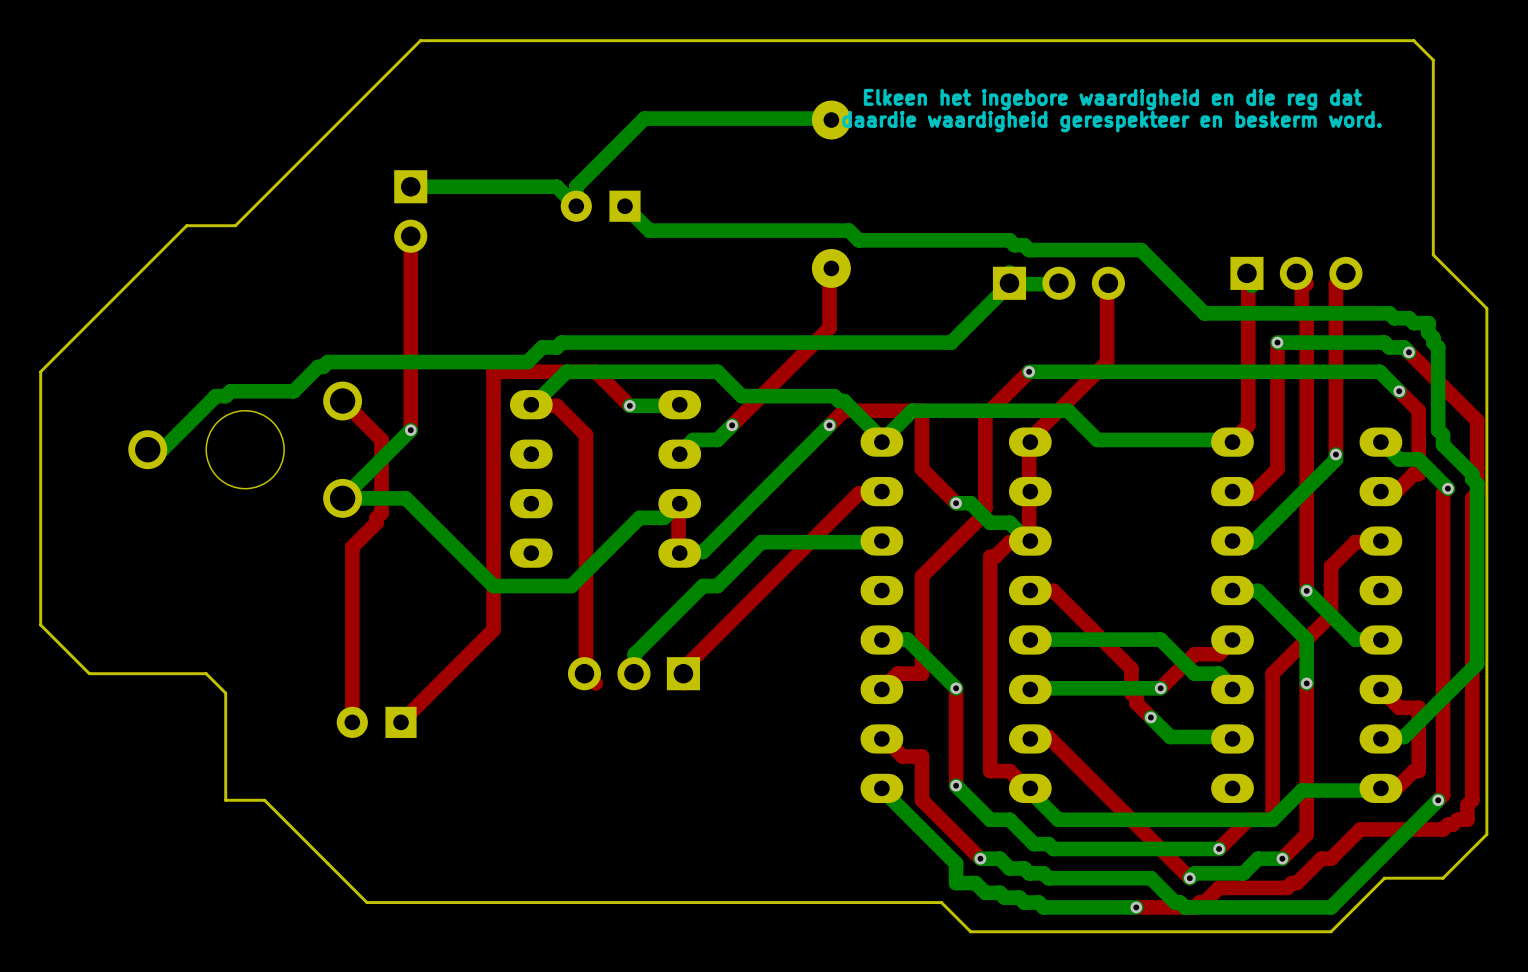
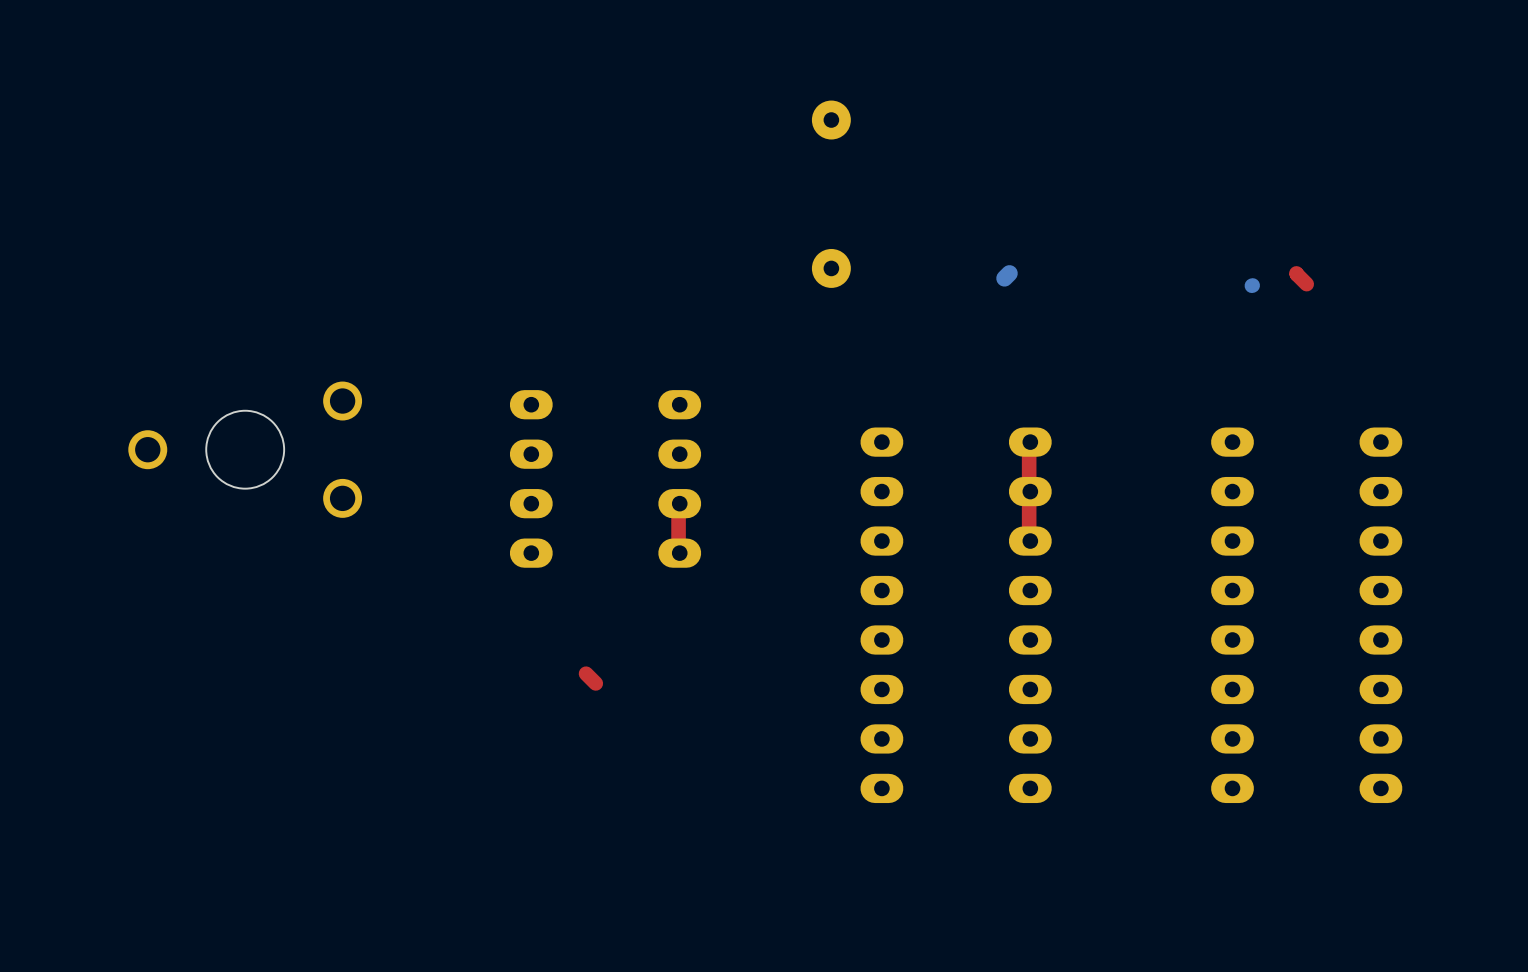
board edge: (1413, 40) (1433, 60) (1433, 254) (1486, 308) (1486, 834) (1443, 878) (1384, 878) (1331, 931) (970, 931) (941, 902) (366, 902) (264, 800) (225, 800) (225, 693) (206, 673) (89, 673) (40, 625) (40, 371) (186, 225) (235, 225) (420, 40) (1413, 40) -> none
text: Elkeen het ingebore waardigheid en die reg dat (1112, 99) -> none
bottom track: (831, 120) (644, 118) (576, 186) (576, 206) (556, 186) (410, 186) -> none
text: daardie waardigheid gerespekteer en beskerm word. (1111, 121) -> none
part: (600, 206) -> none
bottom track: (625, 206) (649, 230) (848, 230) (858, 240) (1009, 240) (1014, 245) (1024, 245) (1029, 250) (1141, 250) (1204, 313) (1389, 313) (1394, 318) (1408, 318) (1413, 323) (1428, 323) (1428, 332) (1438, 347) (1438, 430) (1443, 435) (1443, 444) (1472, 474) (1472, 478) (1477, 483) (1477, 663) (1404, 736) (1379, 736) (1380, 738) -> none
part: (410, 211) -> none
top track: (410, 236) (410, 430) -> none
top track: (831, 268) (829, 269) (829, 327) (732, 425) -> none
top track: (1246, 273) (1248, 425) (1232, 442) -> none
part: (1296, 273) -> none
top track: (1345, 273) (1335, 284) (1335, 454) -> none
top track: (1301, 279) (1301, 313) (1306, 318) (1306, 590) -> none
bottom track: (1058, 283) (1063, 284) (1004, 284) (1009, 283) (1009, 284) (951, 342) (561, 342) (556, 347) (542, 347) (527, 362) (327, 362) (323, 366) (318, 366) (293, 391) (230, 391) (225, 396) (215, 396) (162, 449) (147, 449) -> none
part: (1058, 283) -> none
top track: (1108, 283) (1107, 362) (1029, 439) (1030, 442) -> none
bottom track: (1277, 342) (1384, 342) (1389, 347) (1404, 347) (1408, 352) -> none
top track: (1277, 342) (1277, 469) (1253, 493) (1233, 493) (1232, 491) -> none
via: (1277, 342) -> none
top track: (1408, 352) (1477, 420) (1477, 493) (1472, 498) (1472, 800) (1467, 805) (1467, 819) (1457, 819) (1443, 829) (1360, 829) (1331, 858) (1321, 858) (1296, 883) (1292, 883) (1287, 887) (1219, 887) (1204, 902) (1199, 902) (1194, 907) (1136, 907) -> none
via: (1408, 352) -> none
bottom track: (1029, 371) (1379, 371) (1399, 391) -> none
top track: (1029, 371) (985, 415) (985, 508) (980, 513) (980, 517) (922, 576) (922, 673) (897, 673) (881, 689) -> none
via: (1029, 371) -> none
top track: (1399, 391) (1418, 410) (1418, 474) (1413, 474) (1394, 493) (1379, 493) (1380, 491) -> none
via: (1399, 391) -> none
top track: (342, 401) (381, 439) (381, 513) (376, 517) (376, 522) (352, 547) (352, 722) -> none
bottom track: (531, 404) (566, 371) (717, 371) (741, 396) (834, 396) (839, 401) (844, 401) (883, 439) -> none
top track: (531, 404) (556, 405) (586, 435) (586, 673) (584, 673) -> none
bottom track: (679, 404) (629, 405) -> none
top track: (629, 405) (595, 371) (493, 371) (493, 629) (401, 722) -> none
via: (629, 405) -> none
bottom track: (732, 425) (717, 439) (693, 439) (679, 454) -> none
via: (732, 425) -> none
bottom track: (829, 425) (702, 551) (678, 551) (679, 553) -> none
top track: (829, 425) (844, 410) (922, 410) (922, 469) (956, 503) -> none
via: (829, 425) -> none
bottom track: (410, 430) (342, 498) (405, 498) (493, 586) (571, 586) (639, 517) (663, 517) (679, 503) -> none
via: (410, 430) -> none
bottom track: (883, 439) (912, 410) (1068, 410) (1097, 439) (1233, 439) (1232, 442) -> none
bottom track: (1380, 442) (1379, 439) (1399, 459) (1418, 459) (1447, 488) -> none
bottom track: (1335, 454) (1335, 459) (1253, 542) (1232, 541) -> none
via: (1335, 454) -> none
top track: (1447, 488) (1443, 493) (1443, 795) (1438, 800) -> none
via: (1447, 488) -> none
top track: (881, 491) (883, 493) (858, 493) (683, 668) (683, 683) -> none
bottom track: (956, 503) (970, 503) (990, 522) (1009, 522) (1030, 541) -> none
via: (956, 503) -> none
bottom track: (881, 541) (883, 542) (761, 542) (717, 586) (702, 586) (634, 654) (633, 673) -> none
top track: (1030, 541) (1009, 542) (995, 556) (990, 556) (990, 771) (1009, 771) (1029, 790) (1030, 788) -> none
top track: (1380, 541) (1355, 542) (1331, 566) (1331, 615) (1272, 673) (1272, 819) (1248, 819) (1219, 848) -> none
top track: (1030, 590) (1053, 590) (1131, 668) (1131, 693) (1136, 698) (1136, 702) (1150, 717) -> none
bottom track: (1232, 590) (1258, 590) (1306, 639) (1306, 683) -> none
bottom track: (1306, 590) (1355, 639) (1380, 639) -> none
via: (1306, 590) -> none
bottom track: (881, 639) (907, 639) (956, 688) -> none
bottom track: (1030, 639) (1160, 639) (1194, 673) (1219, 673) (1232, 689) -> none
top track: (1232, 639) (1219, 654) (1194, 654) (1160, 688) -> none
part: (633, 673) -> none
top track: (1306, 683) (1306, 834) (1282, 858) -> none
via: (1306, 683) -> none
top track: (956, 688) (956, 785) -> none
via: (956, 688) -> none
bottom track: (1160, 688) (1029, 688) (1030, 689) -> none
via: (1160, 688) -> none
top track: (1380, 689) (1399, 707) (1418, 707) (1418, 771) (1413, 771) (1394, 790) (1379, 790) (1380, 788) -> none
bottom track: (1150, 717) (1170, 736) (1233, 736) (1232, 738) -> none
via: (1150, 717) -> none
part: (376, 722) -> none
top track: (881, 738) (883, 736) (902, 756) (922, 756) (922, 800) (980, 858) -> none
top track: (1030, 738) (1029, 736) (1048, 736) (1189, 878) -> none
bottom track: (956, 785) (990, 819) (1009, 819) (1034, 844) (1048, 844) (1053, 848) (1219, 848) -> none
via: (956, 785) -> none
bottom track: (881, 788) (956, 863) (956, 883) (975, 883) (985, 892) (999, 892) (1004, 897) (1019, 897) (1024, 902) (1038, 902) (1043, 907) (1136, 907) -> none
bottom track: (1380, 788) (1379, 790) (1301, 790) (1272, 819) (1058, 819) (1029, 790) (1030, 788) -> none
bottom track: (1438, 800) (1331, 907) (1184, 907) (1180, 902) (1175, 902) (1150, 878) (1048, 878) (1043, 873) (1029, 873) (1024, 868) (1009, 868) (999, 858) (980, 858) -> none
via: (1438, 800) -> none
via: (1219, 848) -> none
via: (980, 858) -> none
bottom track: (1282, 858) (1258, 858) (1243, 873) (1194, 873) (1189, 878) -> none
via: (1282, 858) -> none
via: (1189, 878) -> none
via: (1136, 907) -> none

